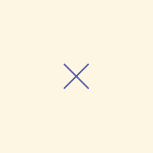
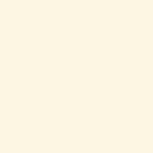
no-connect mark: (76, 76) -> none

